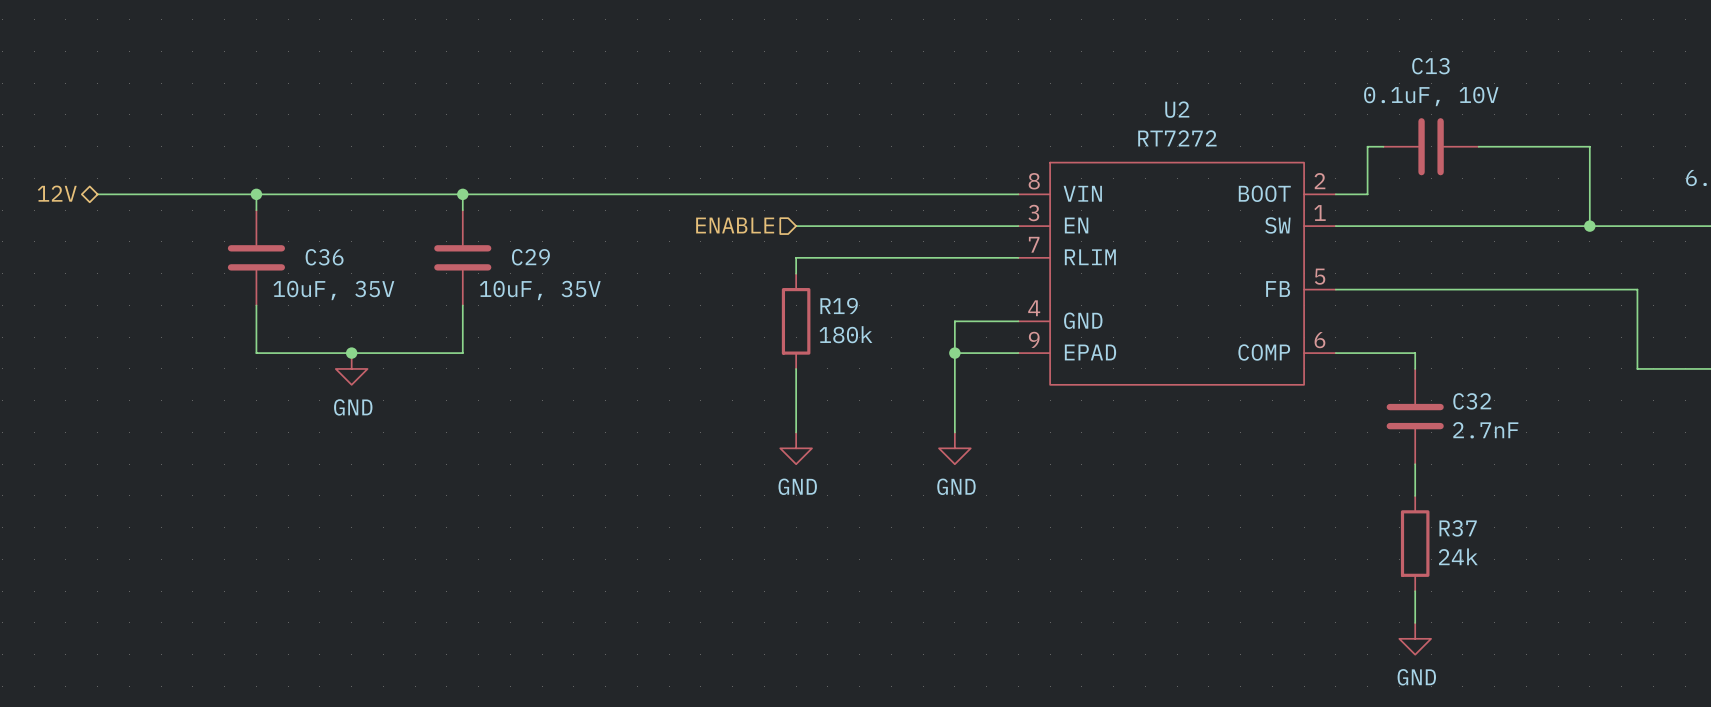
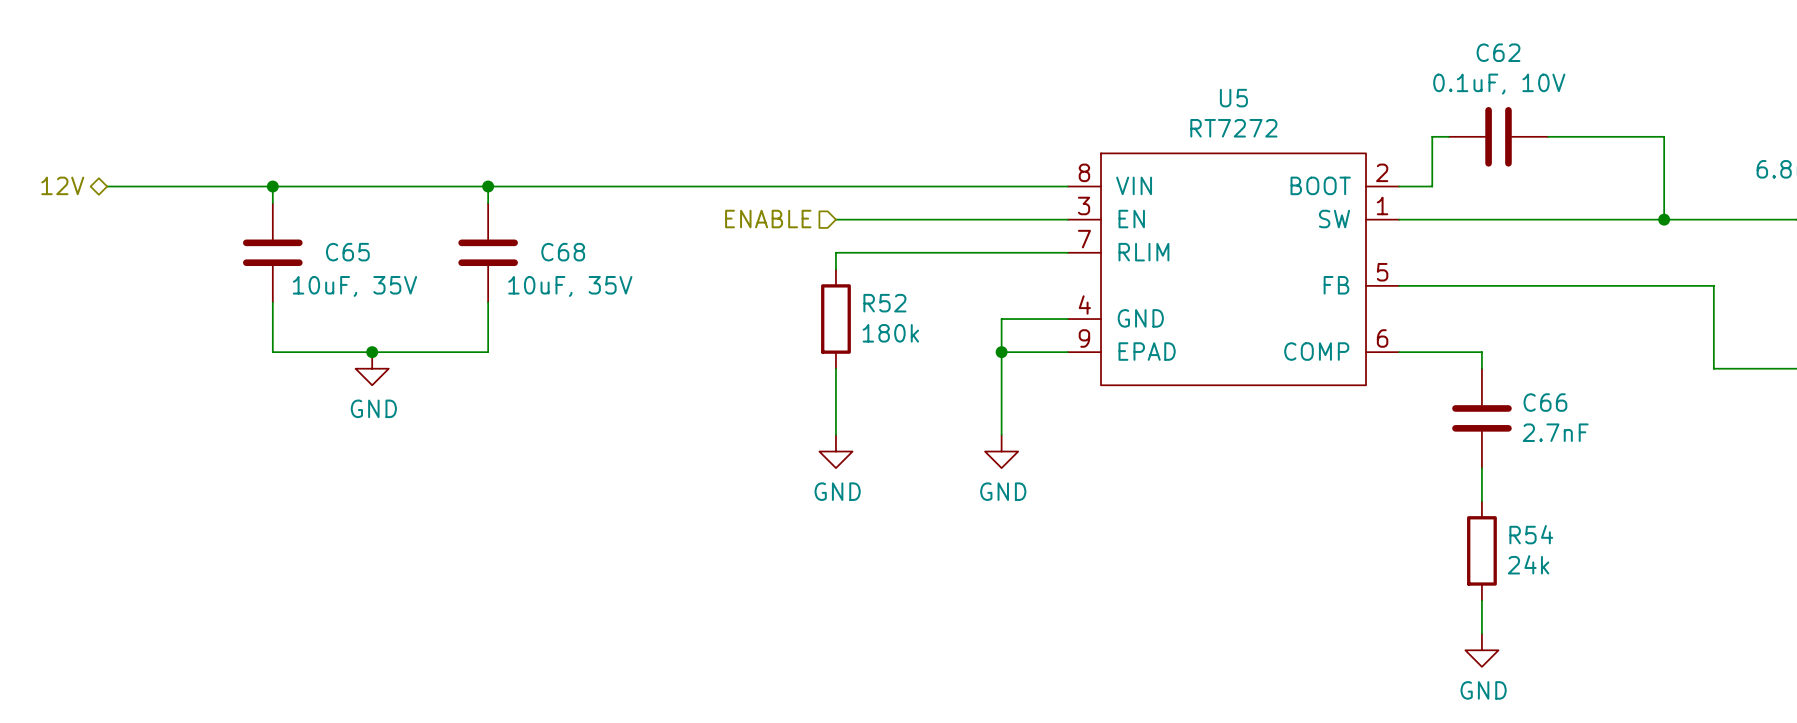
C13 name: C13 (1430, 66) -> C62 (1498, 52)
U2 name: U2 (1177, 109) -> U5 (1233, 98)
C36 name: C36 (324, 257) -> C65 (347, 252)
C29 name: C29 (530, 257) -> C68 (563, 252)
R19 name: R19 (839, 306) -> R52 (884, 303)
C32 name: C32 (1472, 401) -> C66 (1545, 402)
R37 name: R37 (1458, 528) -> R54 (1531, 534)

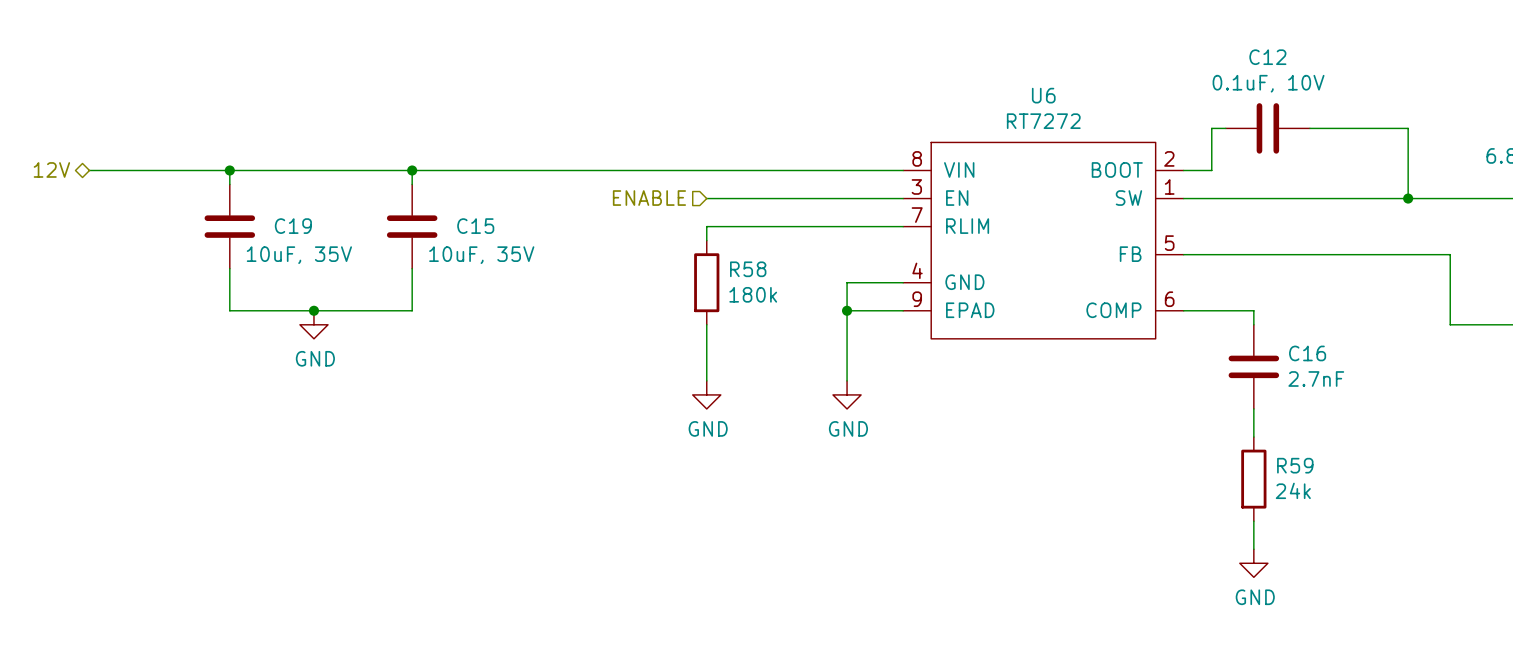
C62 name: C62 (1498, 52) -> C12 (1267, 57)
U5 name: U5 (1233, 98) -> U6 (1043, 95)
C65 name: C65 (347, 252) -> C19 (293, 226)
C68 name: C68 (563, 252) -> C15 (475, 226)
R52 name: R52 (884, 303) -> R58 (748, 269)
C66 name: C66 (1545, 402) -> C16 (1307, 353)
R54 name: R54 (1531, 534) -> R59 (1295, 465)

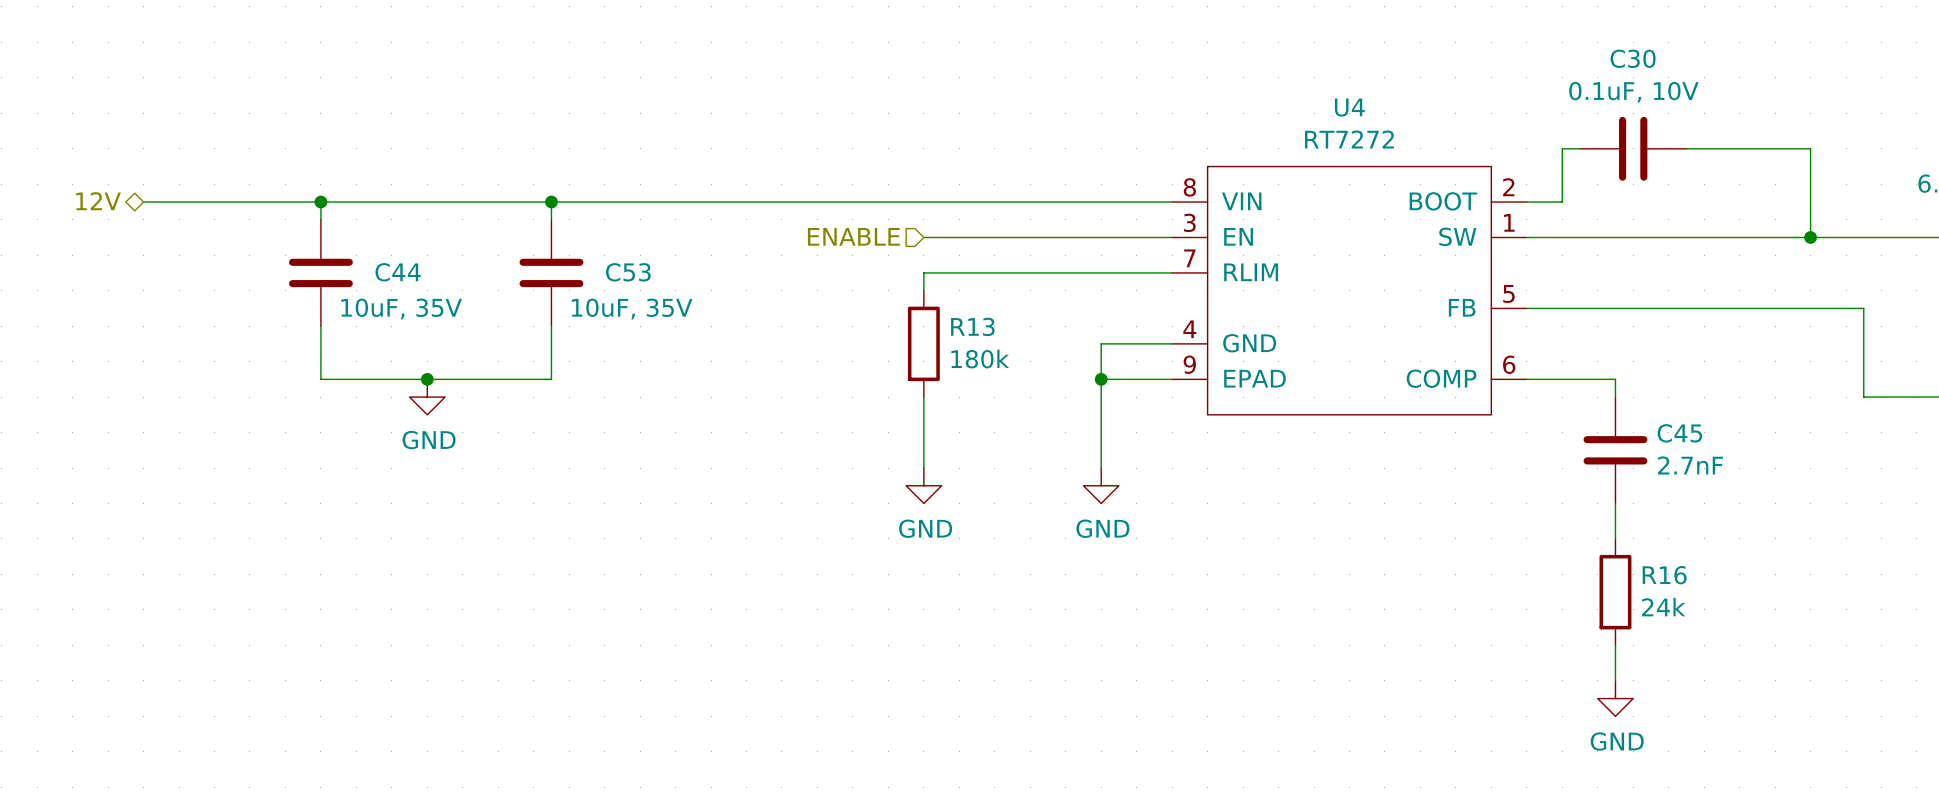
C12 name: C12 (1267, 57) -> C30 (1633, 58)
U6 name: U6 (1043, 95) -> U4 (1349, 107)
C19 name: C19 (293, 226) -> C44 (398, 272)
C15 name: C15 (475, 226) -> C53 (628, 272)
R58 name: R58 (748, 269) -> R13 (972, 326)
C16 name: C16 (1307, 353) -> C45 (1679, 433)
R59 name: R59 (1295, 465) -> R16 (1664, 575)

